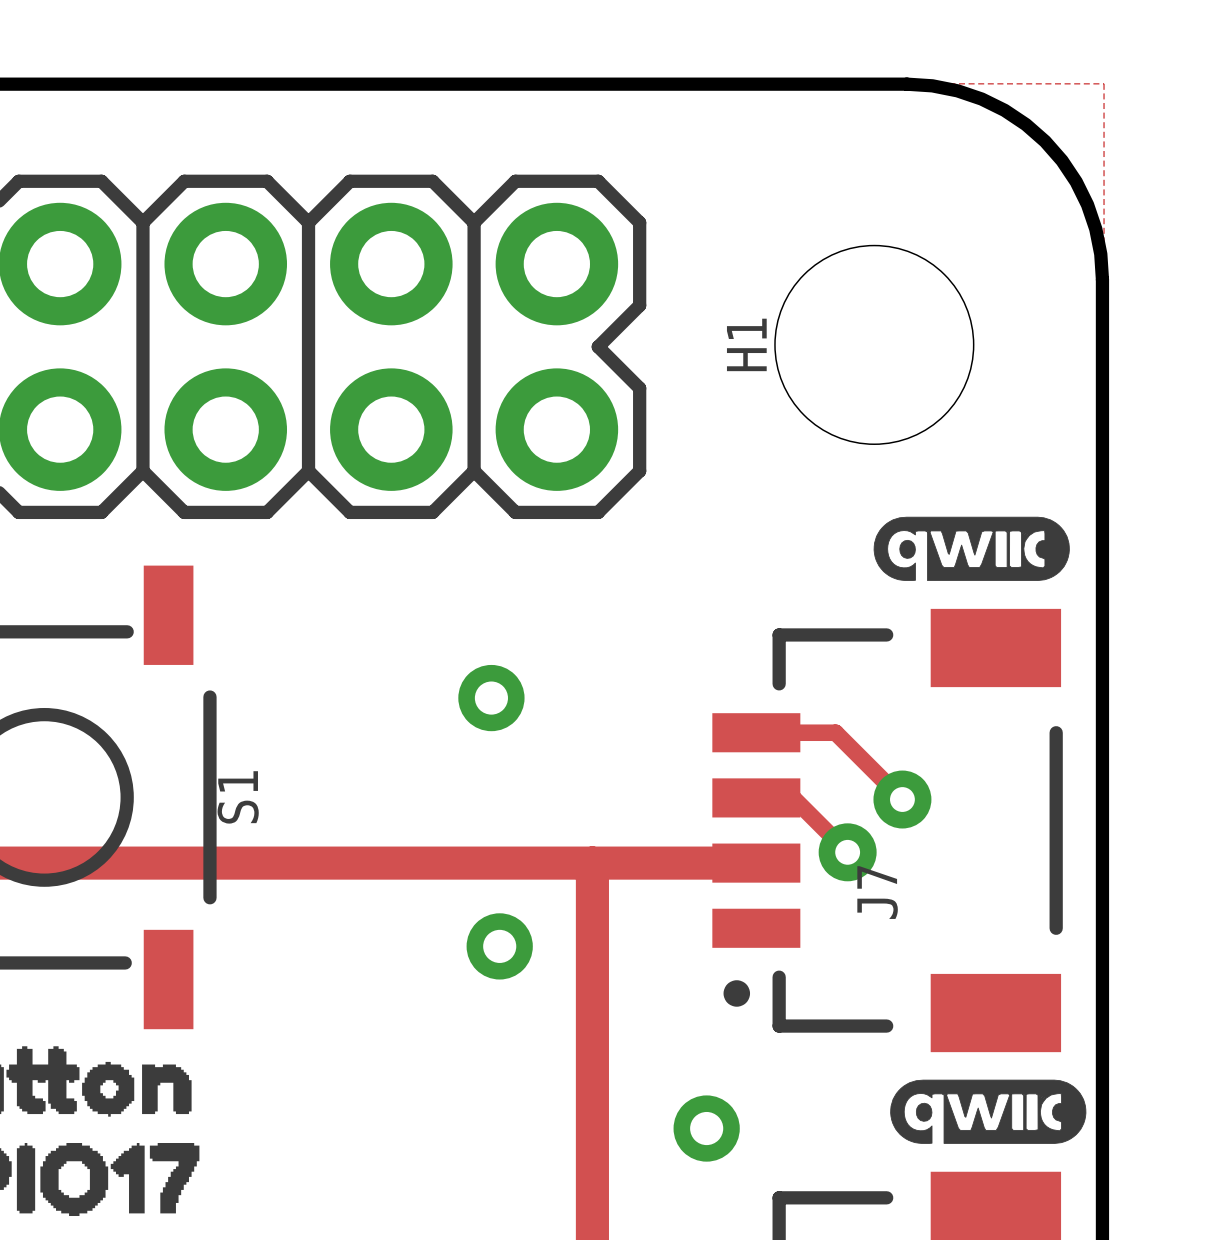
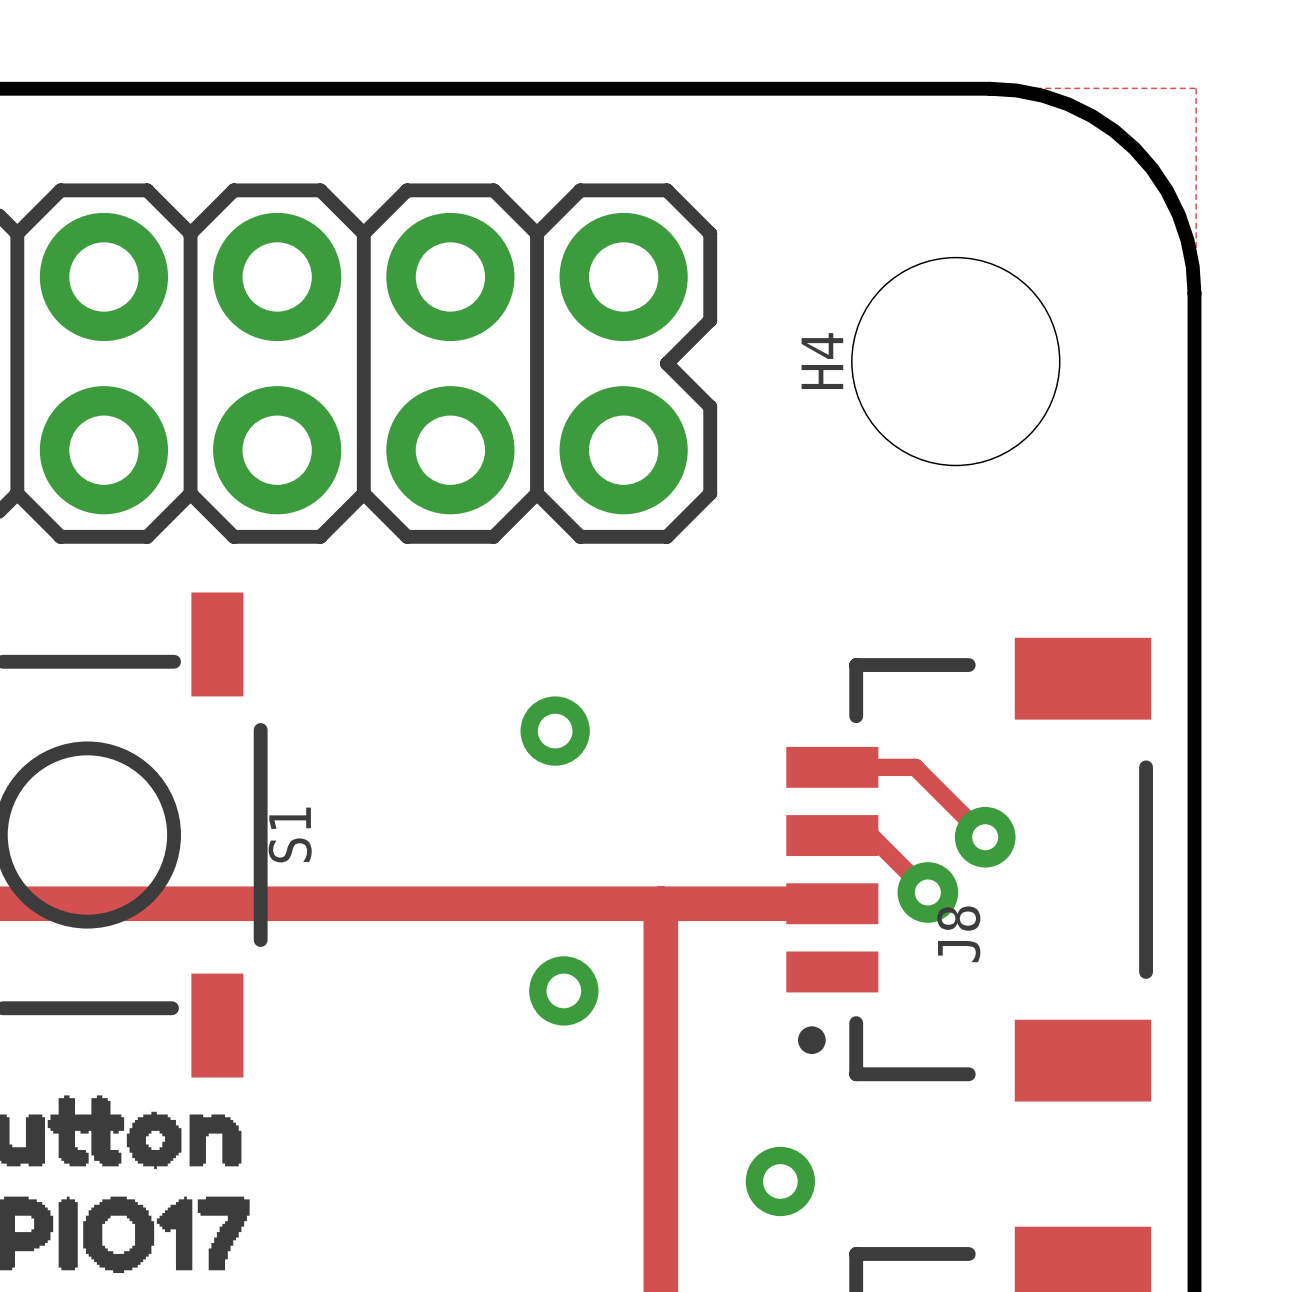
H1 name: H1 (746, 344) -> H4 (822, 361)
drawing: [873, 516, 1070, 581] -> none
J7 name: J7 (877, 892) -> J8 (958, 934)
drawing: [890, 1079, 1087, 1144] -> none

